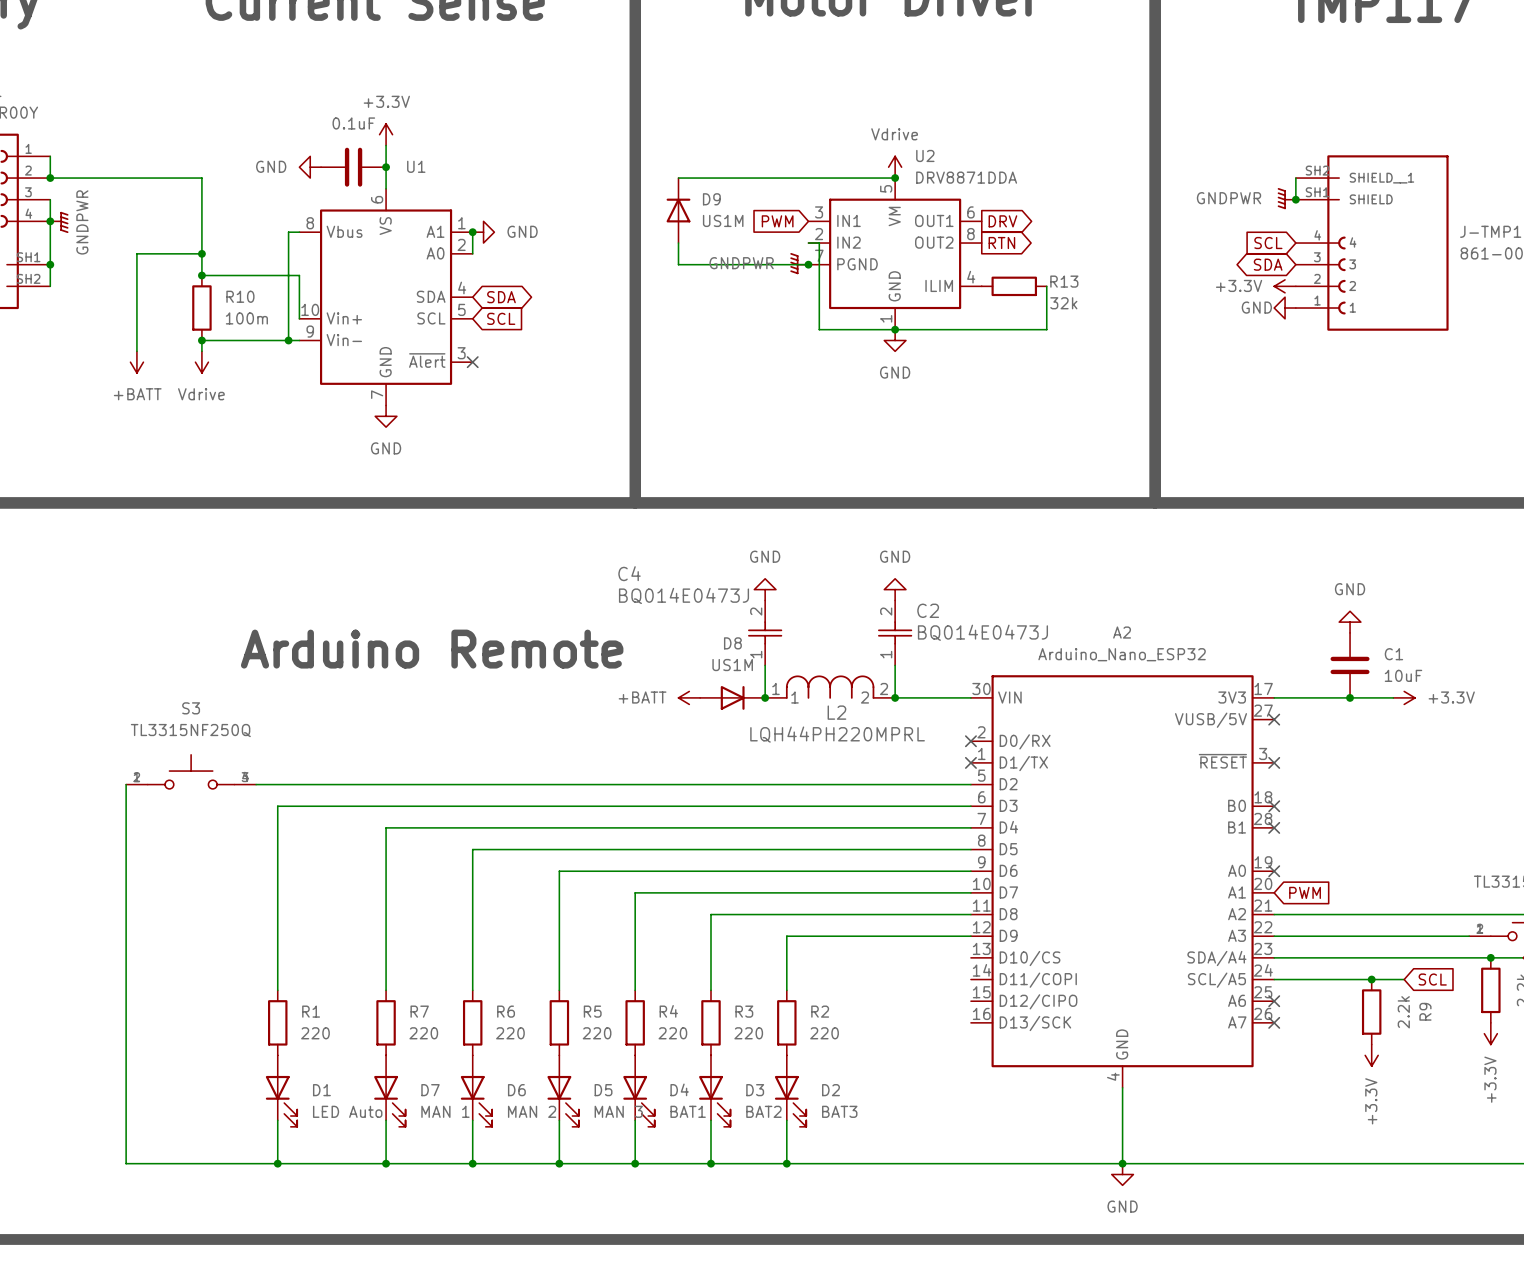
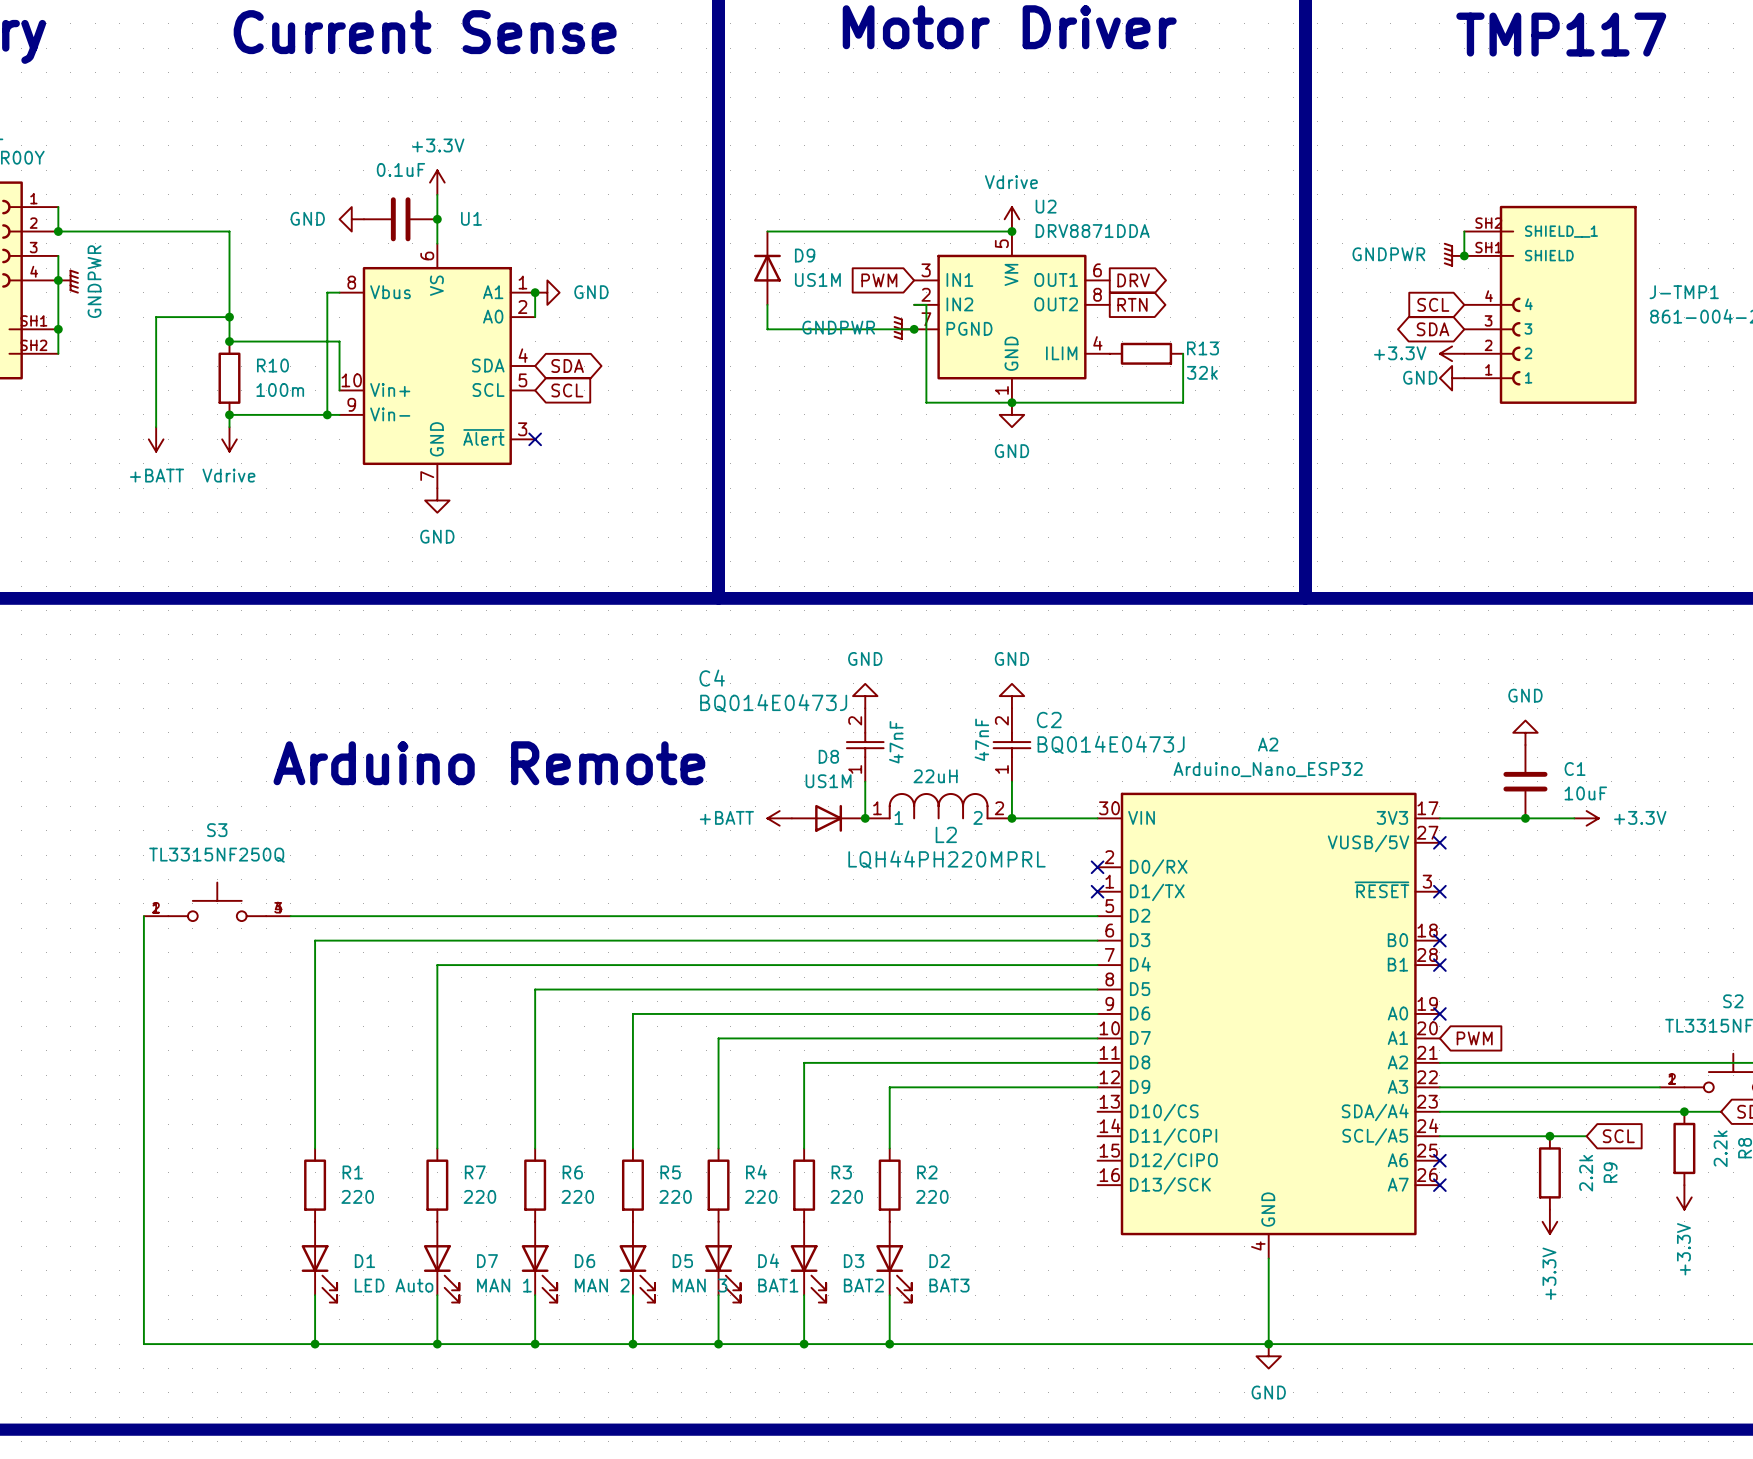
C2 text: none -> 47nF (981, 739)
C4 text: none -> 47nF (896, 742)
L2 text: none -> 22uH (935, 776)

